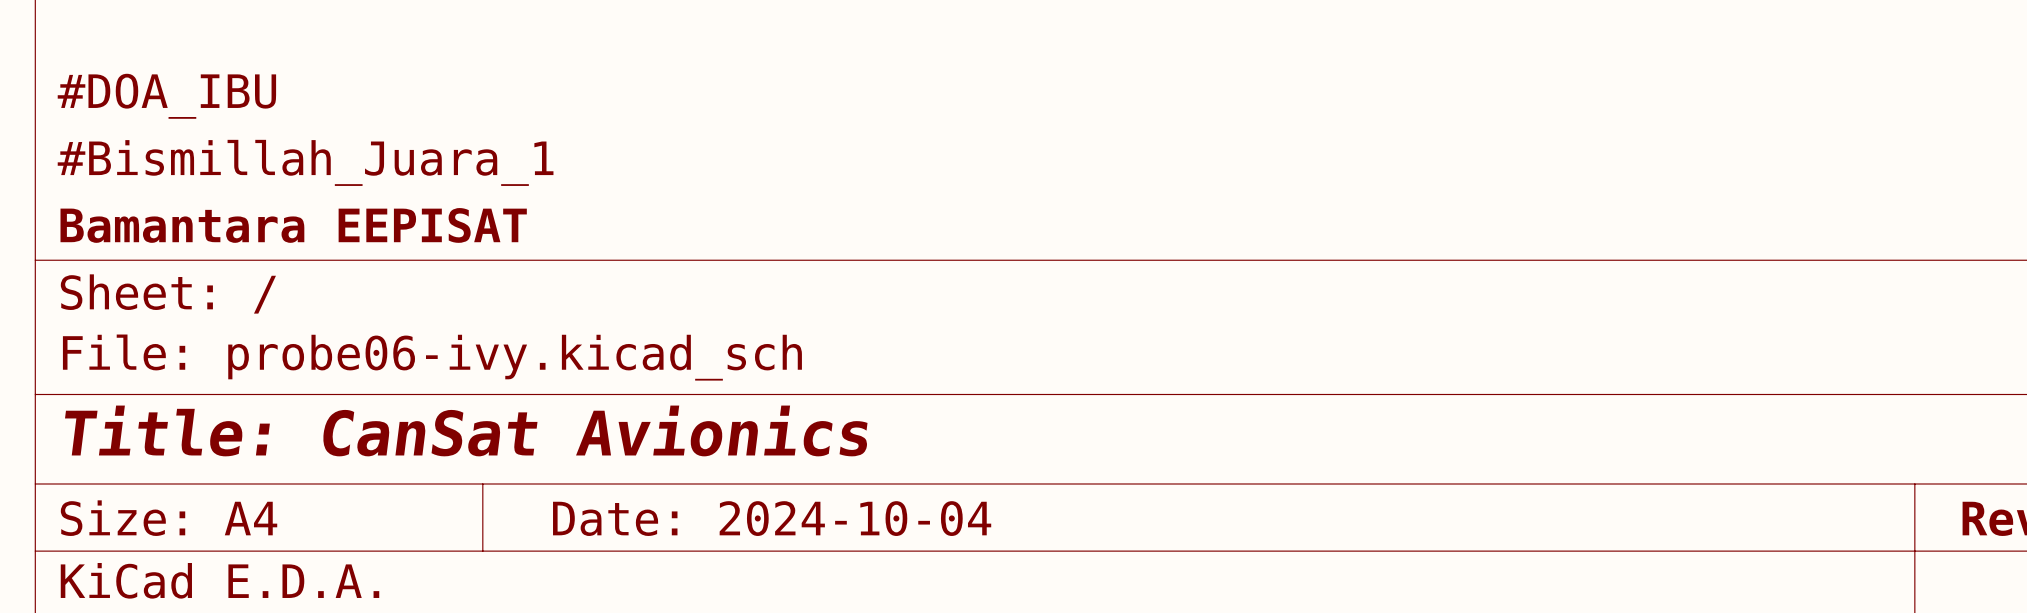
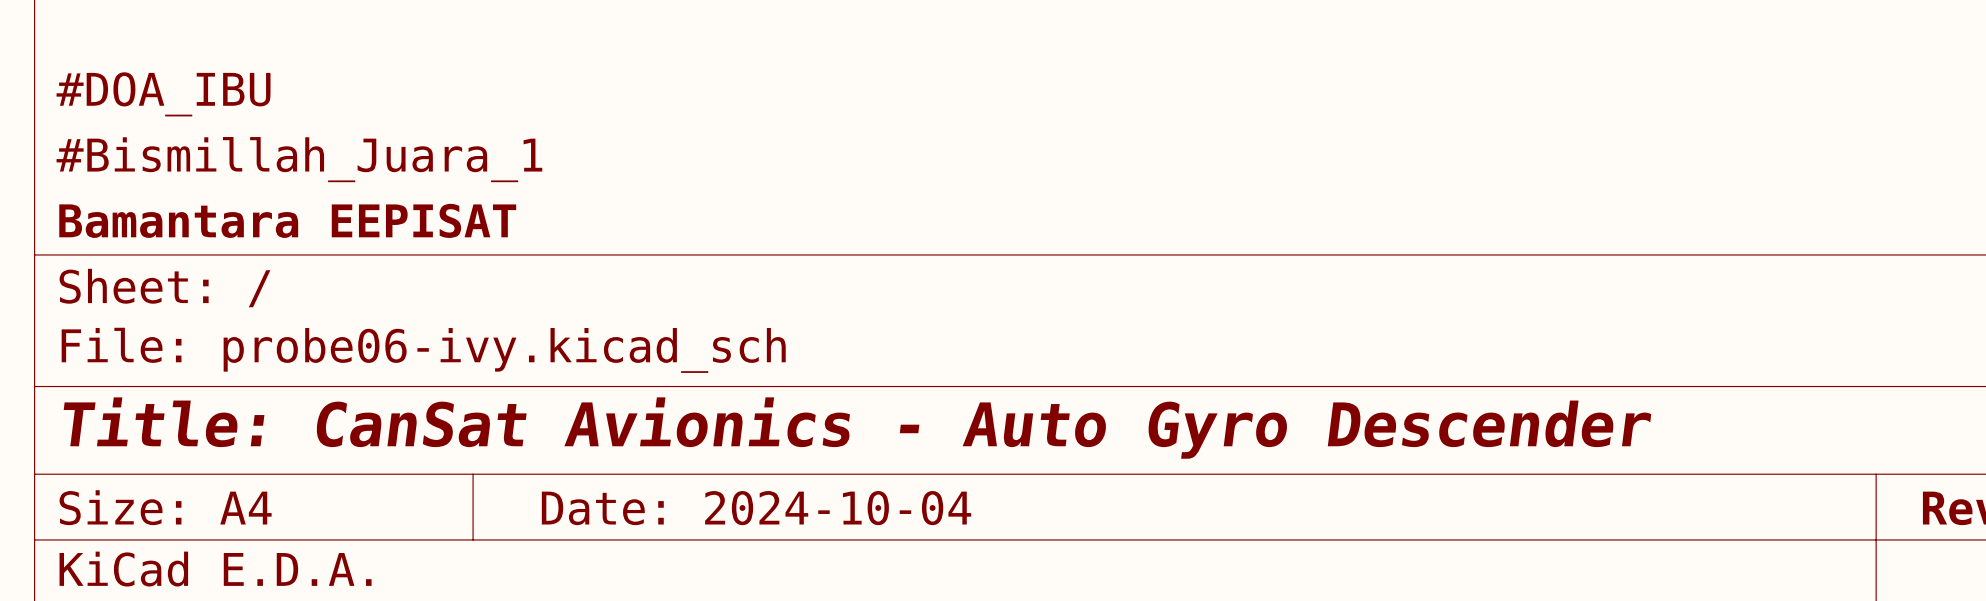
title block: Title: CanSat Avionics (466, 430) -> Title: CanSat Avionics - Auto Gyro Descender (857, 428)

